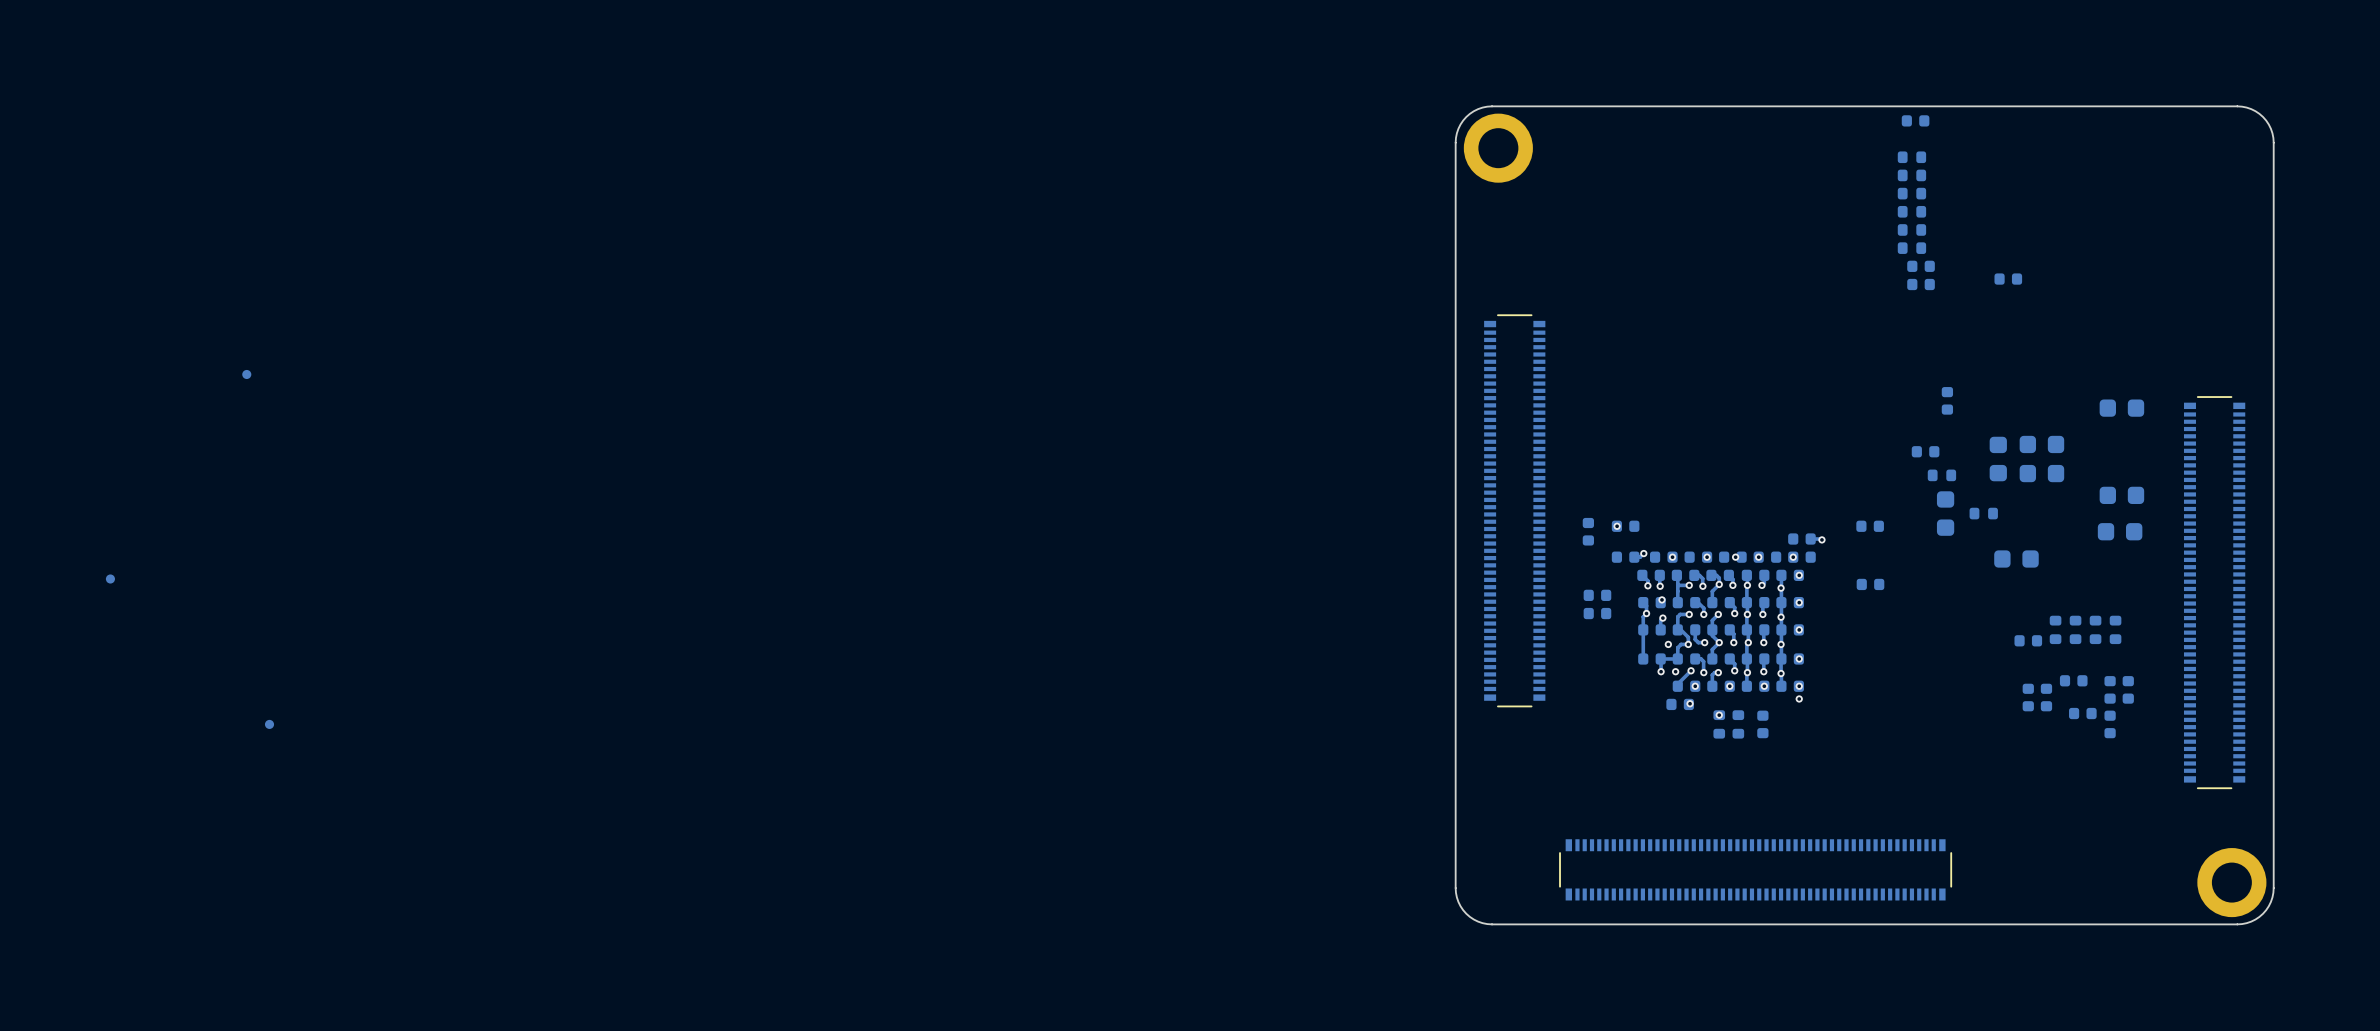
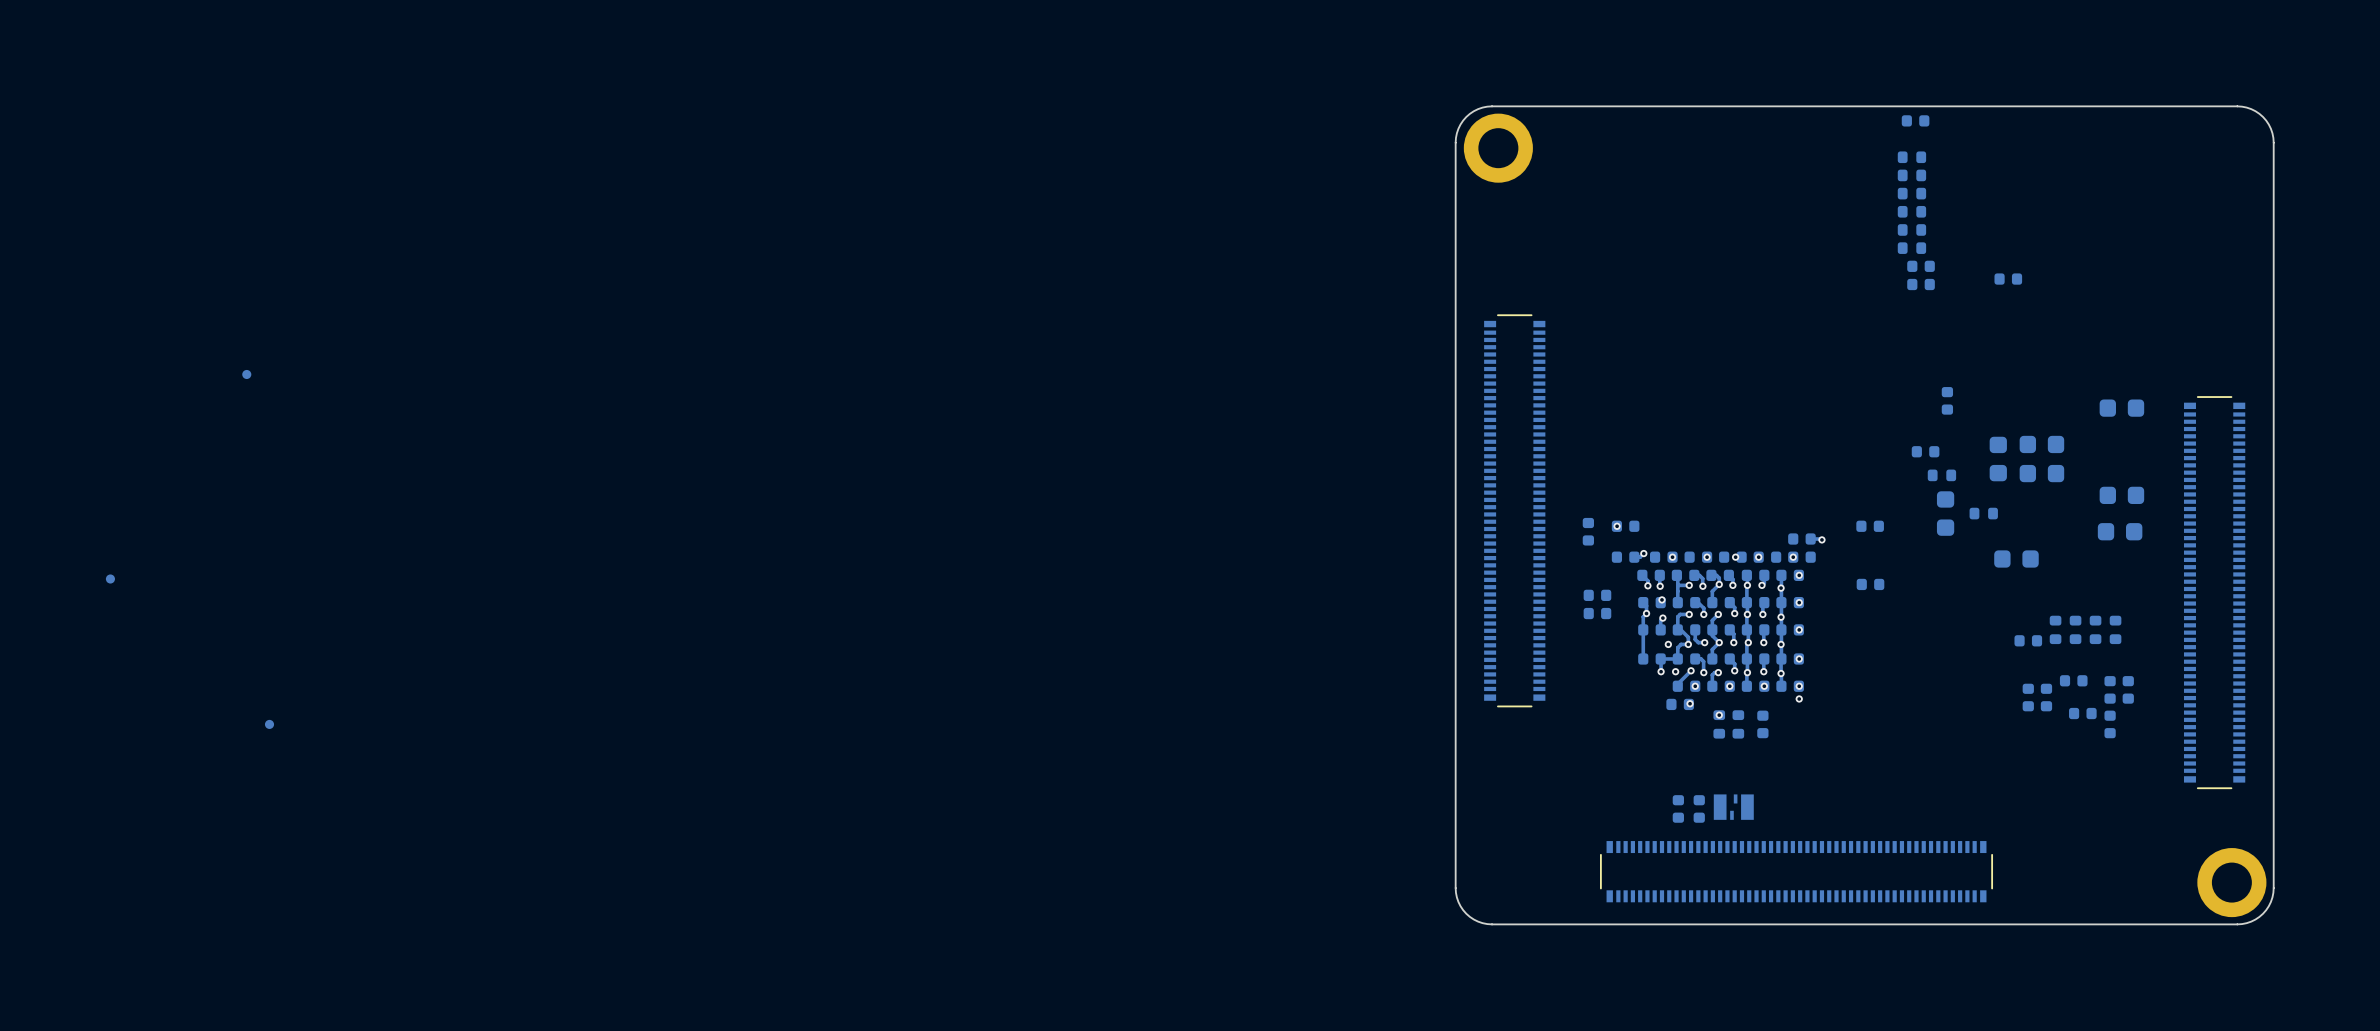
part: none -> (1733, 807)
part: none -> (1678, 808)
part: none -> (1699, 808)
part position: (1755, 869) -> (1796, 871)

